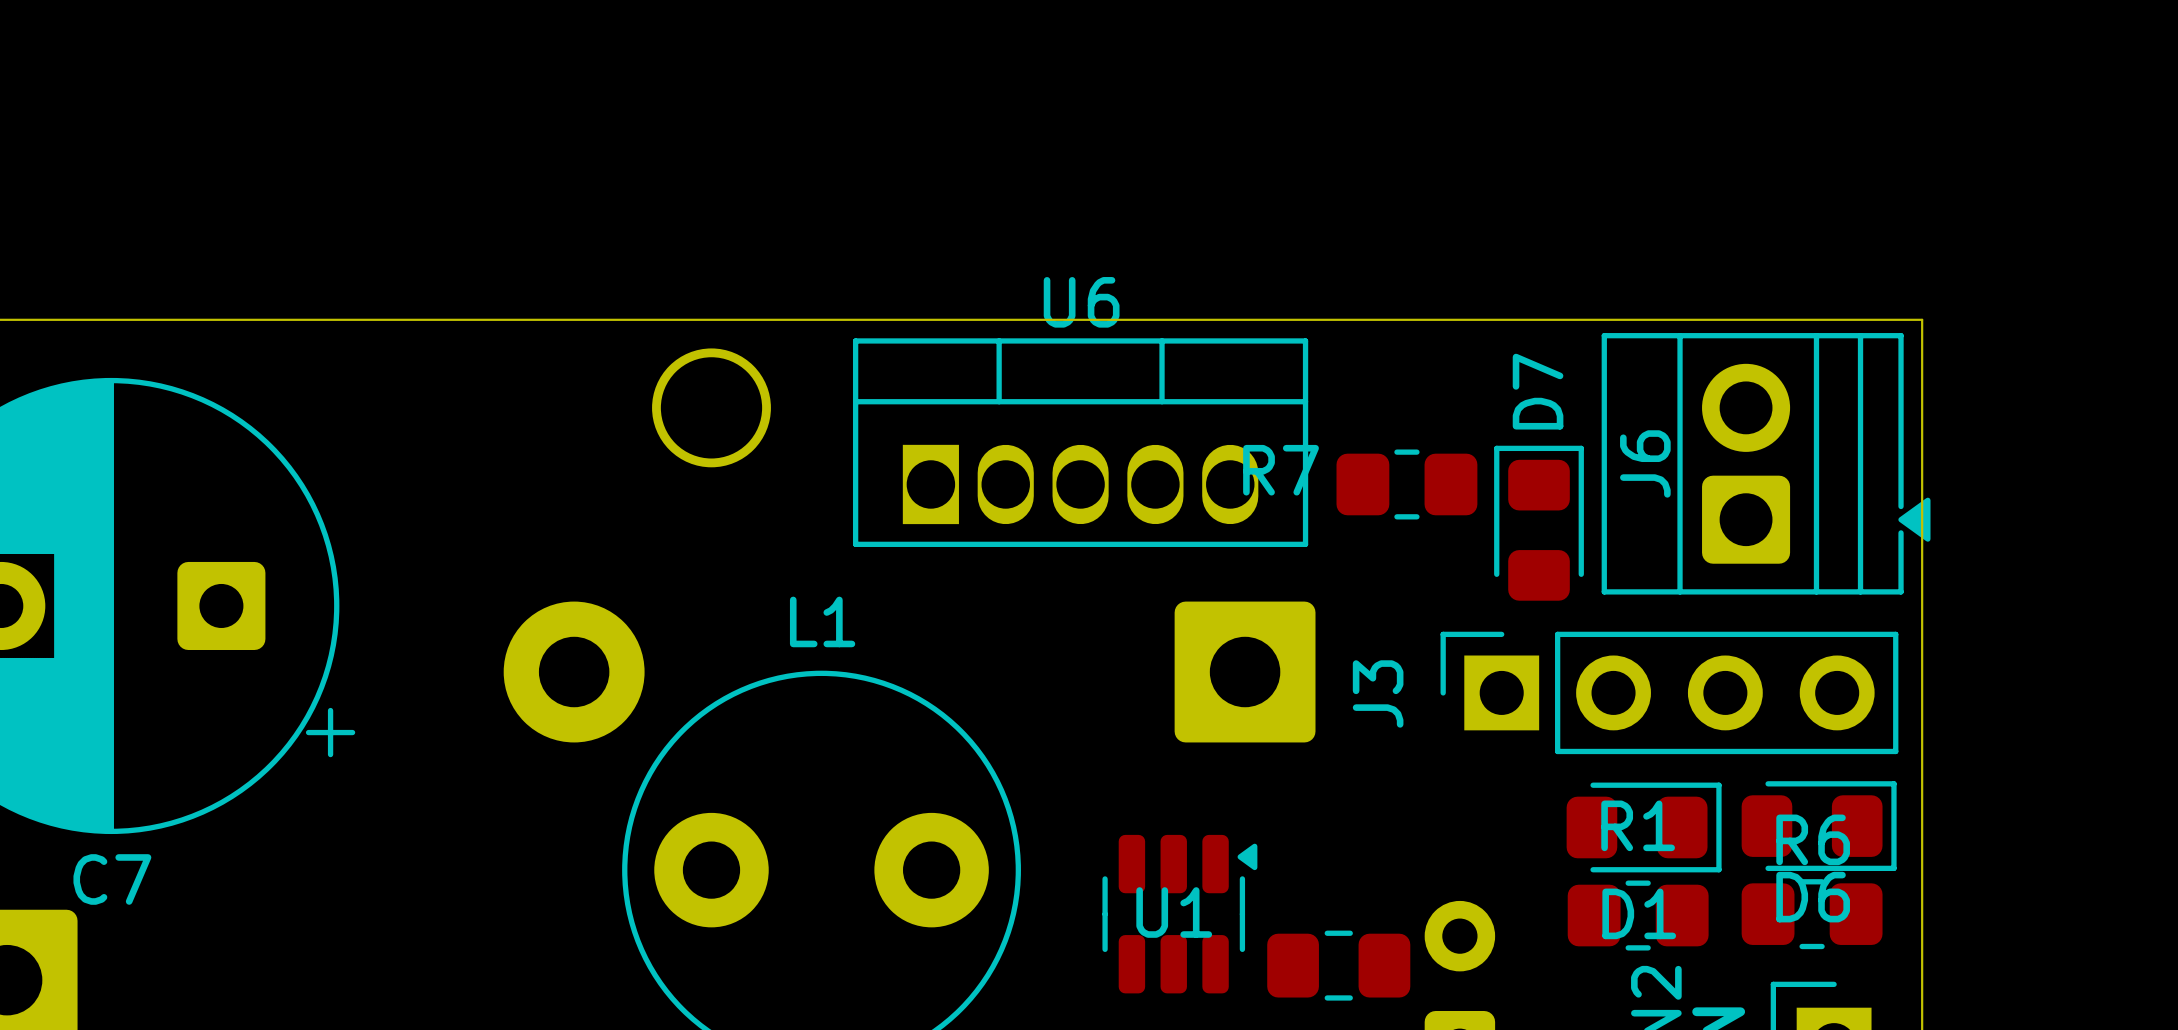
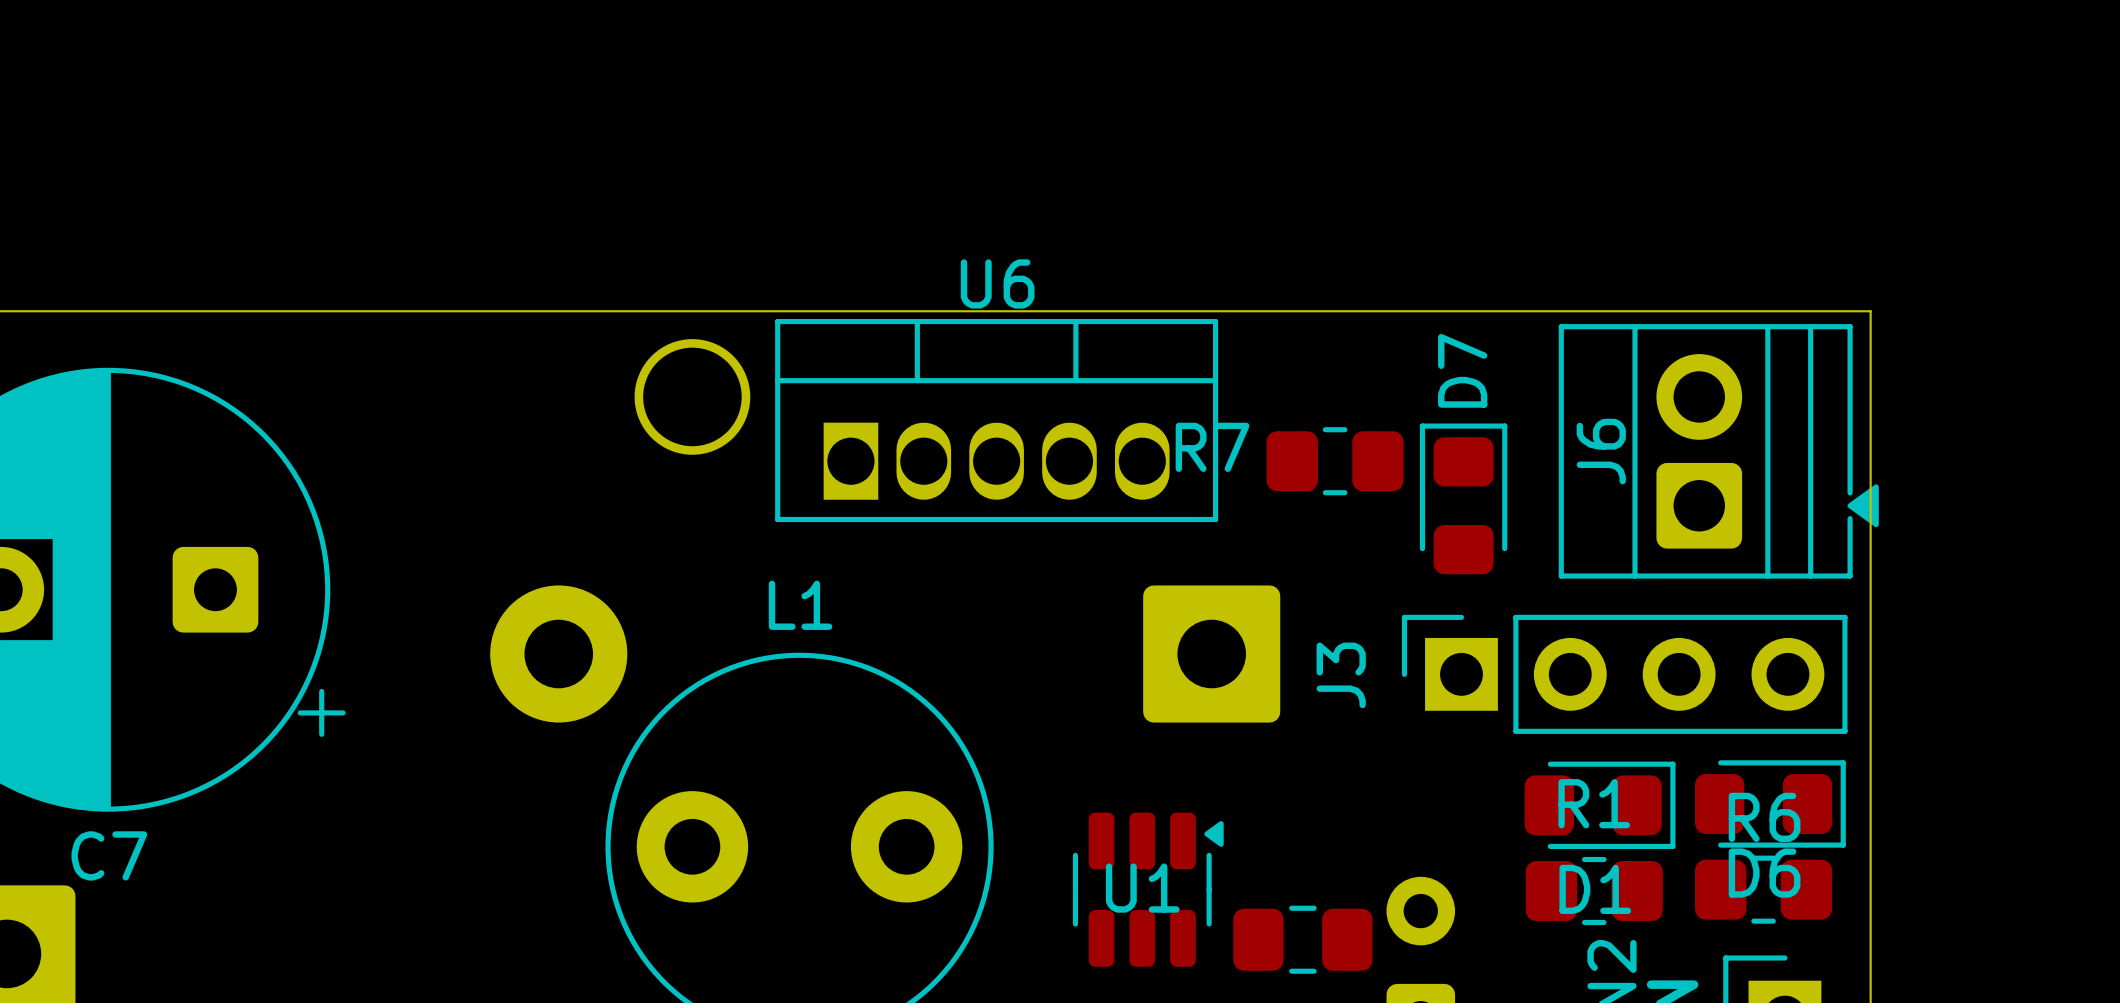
U6 position: (1080, 442) -> (996, 420)
R7 position: (1406, 484) -> (1335, 461)
D7 position: (1539, 523) -> (1463, 498)

